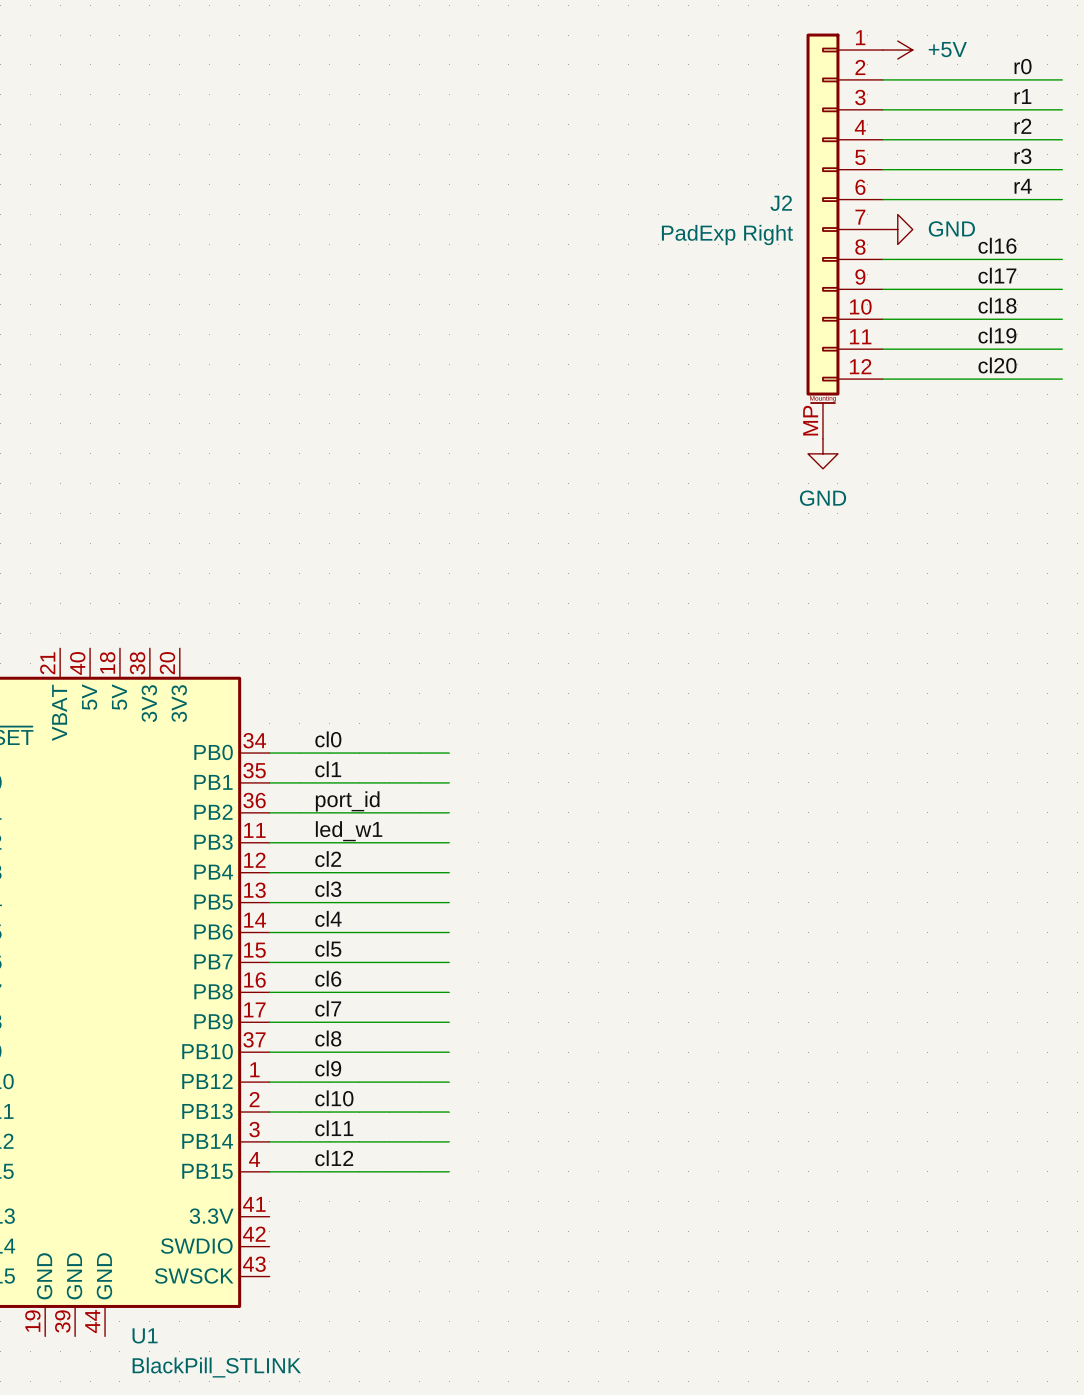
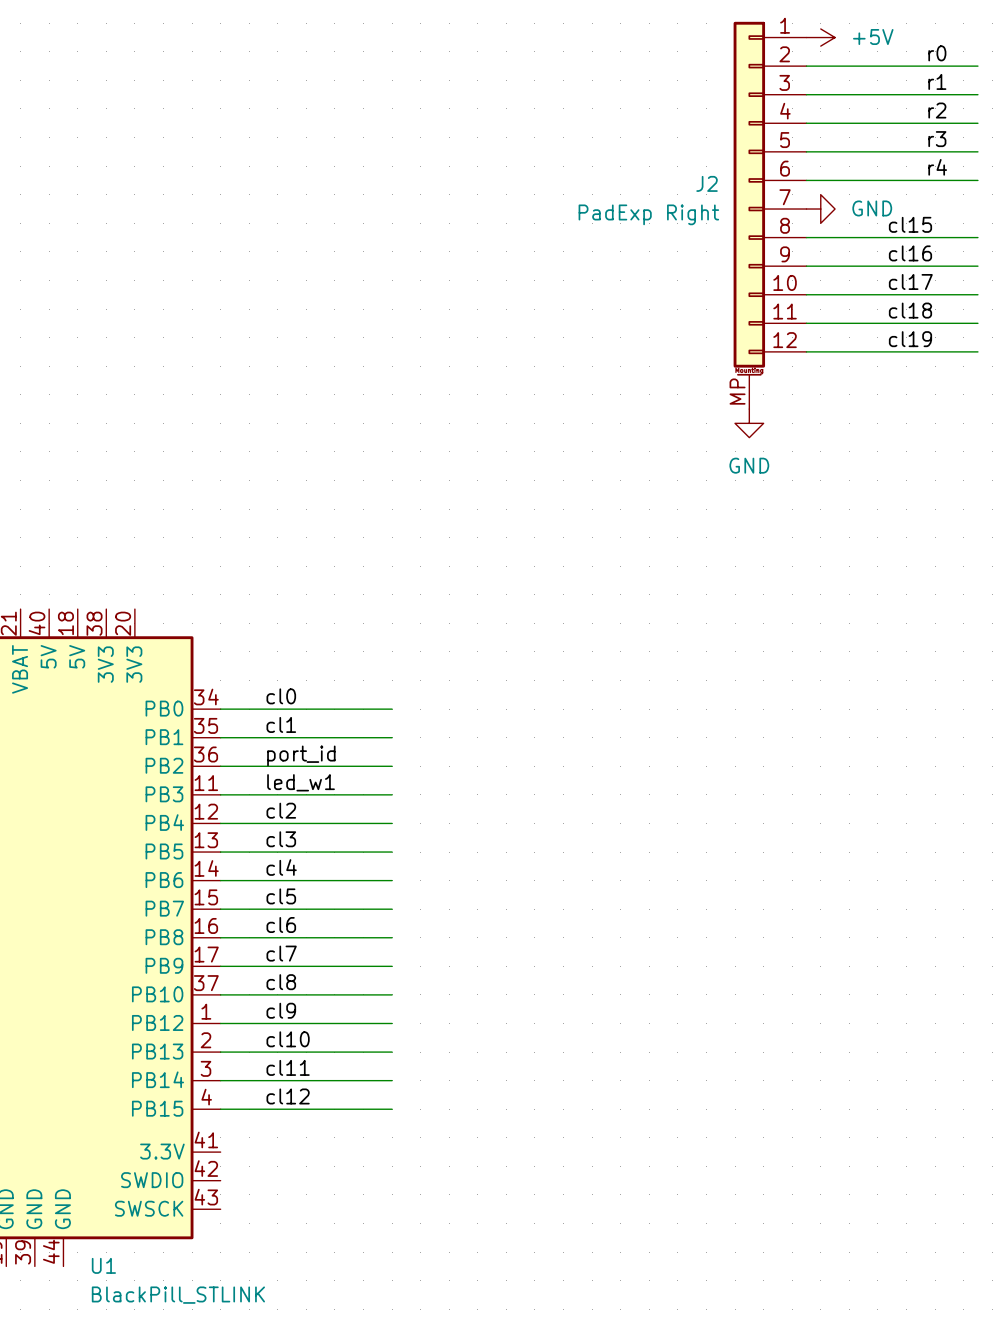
label: cl16 (997, 245) -> cl15 (910, 224)
label: cl17 (997, 275) -> cl16 (910, 253)
label: cl18 (997, 305) -> cl17 (910, 281)
label: cl19 (997, 335) -> cl18 (910, 310)
label: cl20 (997, 365) -> cl19 (910, 339)

